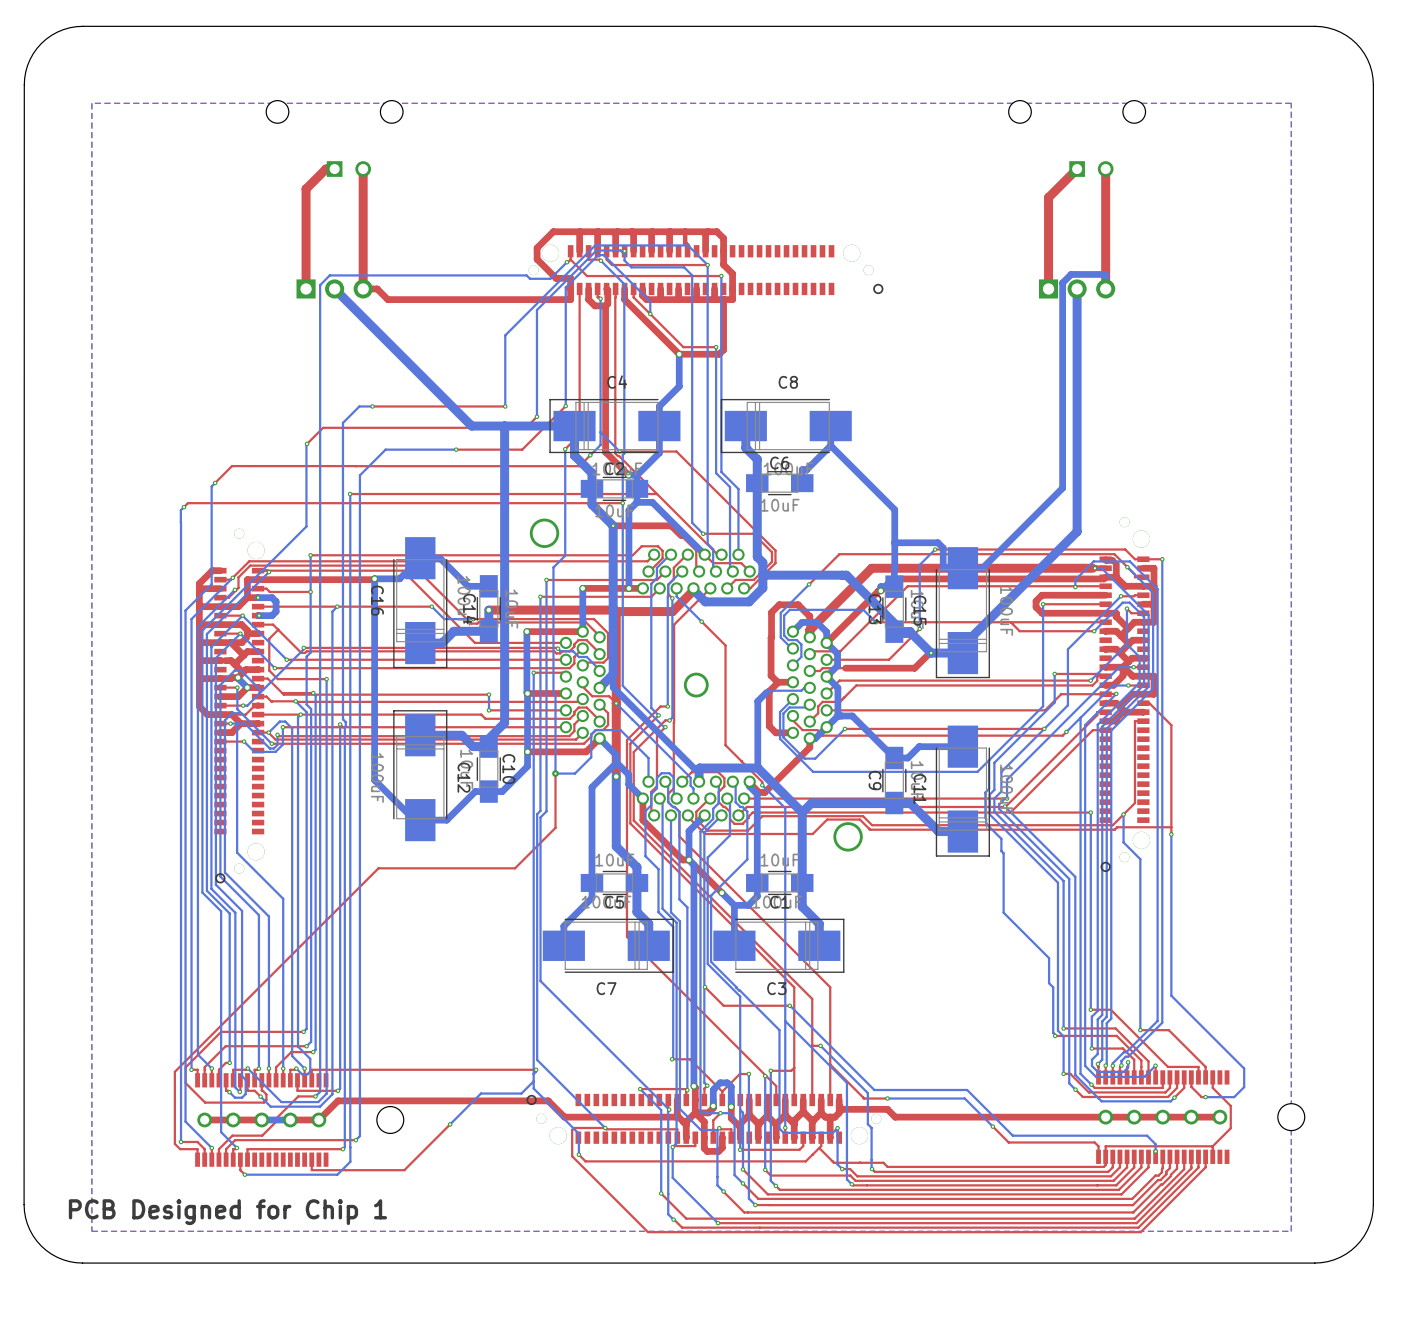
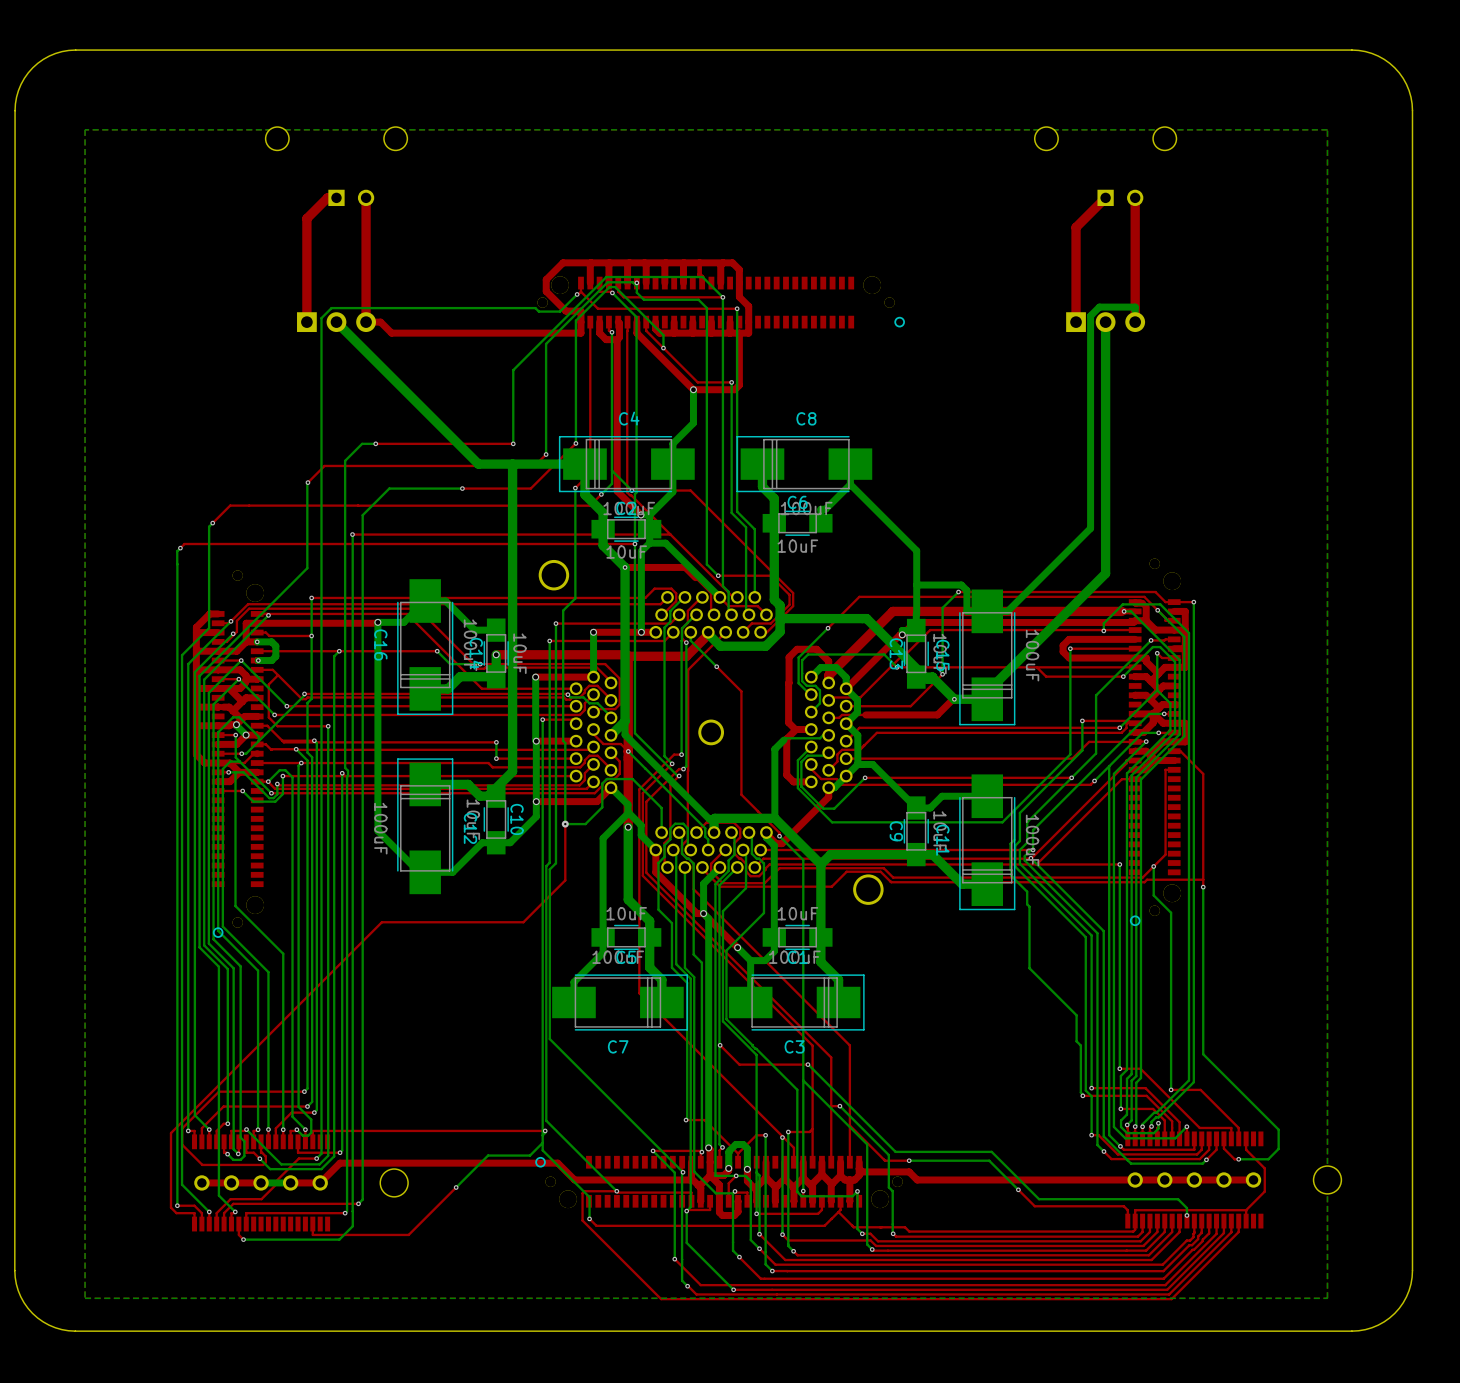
text: PCB Designed for Chip 1 (227, 1212) -> none

